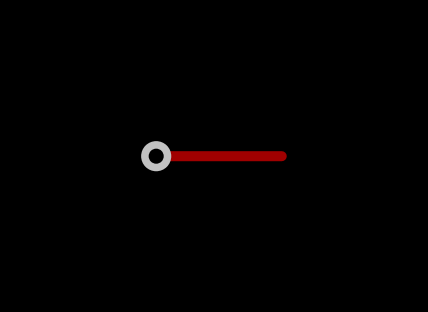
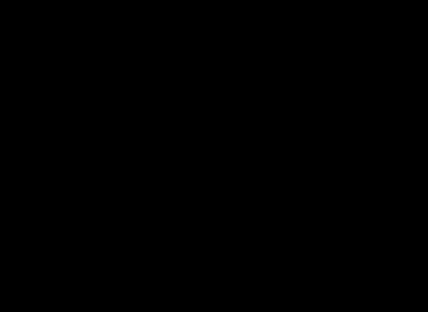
via: (156, 156) -> none
top track: (281, 156) (156, 156) -> none

